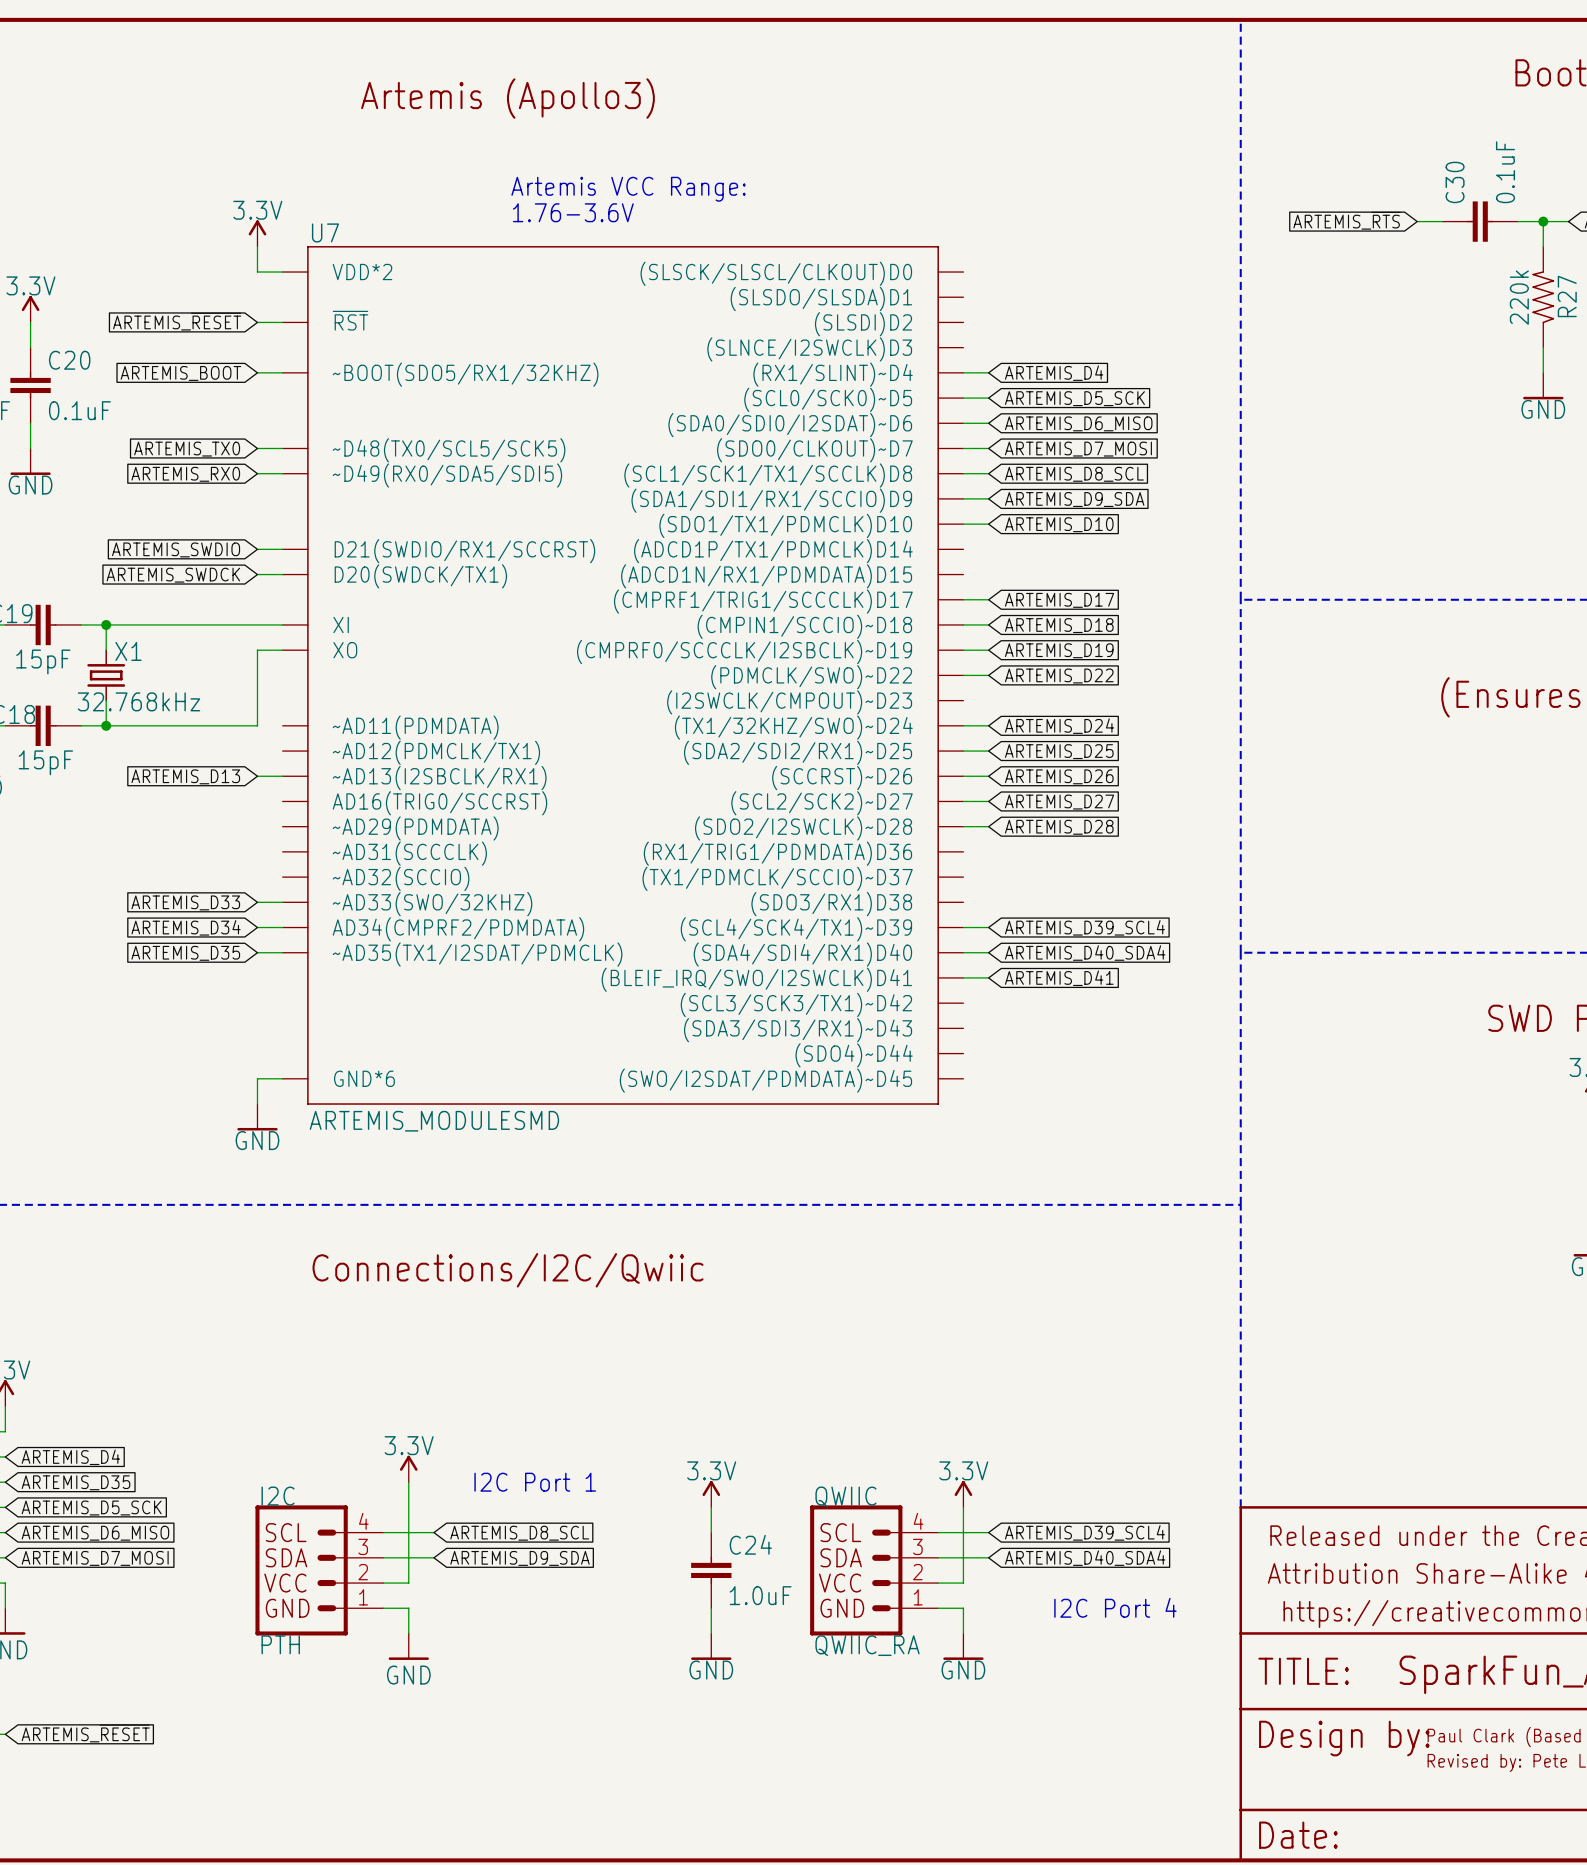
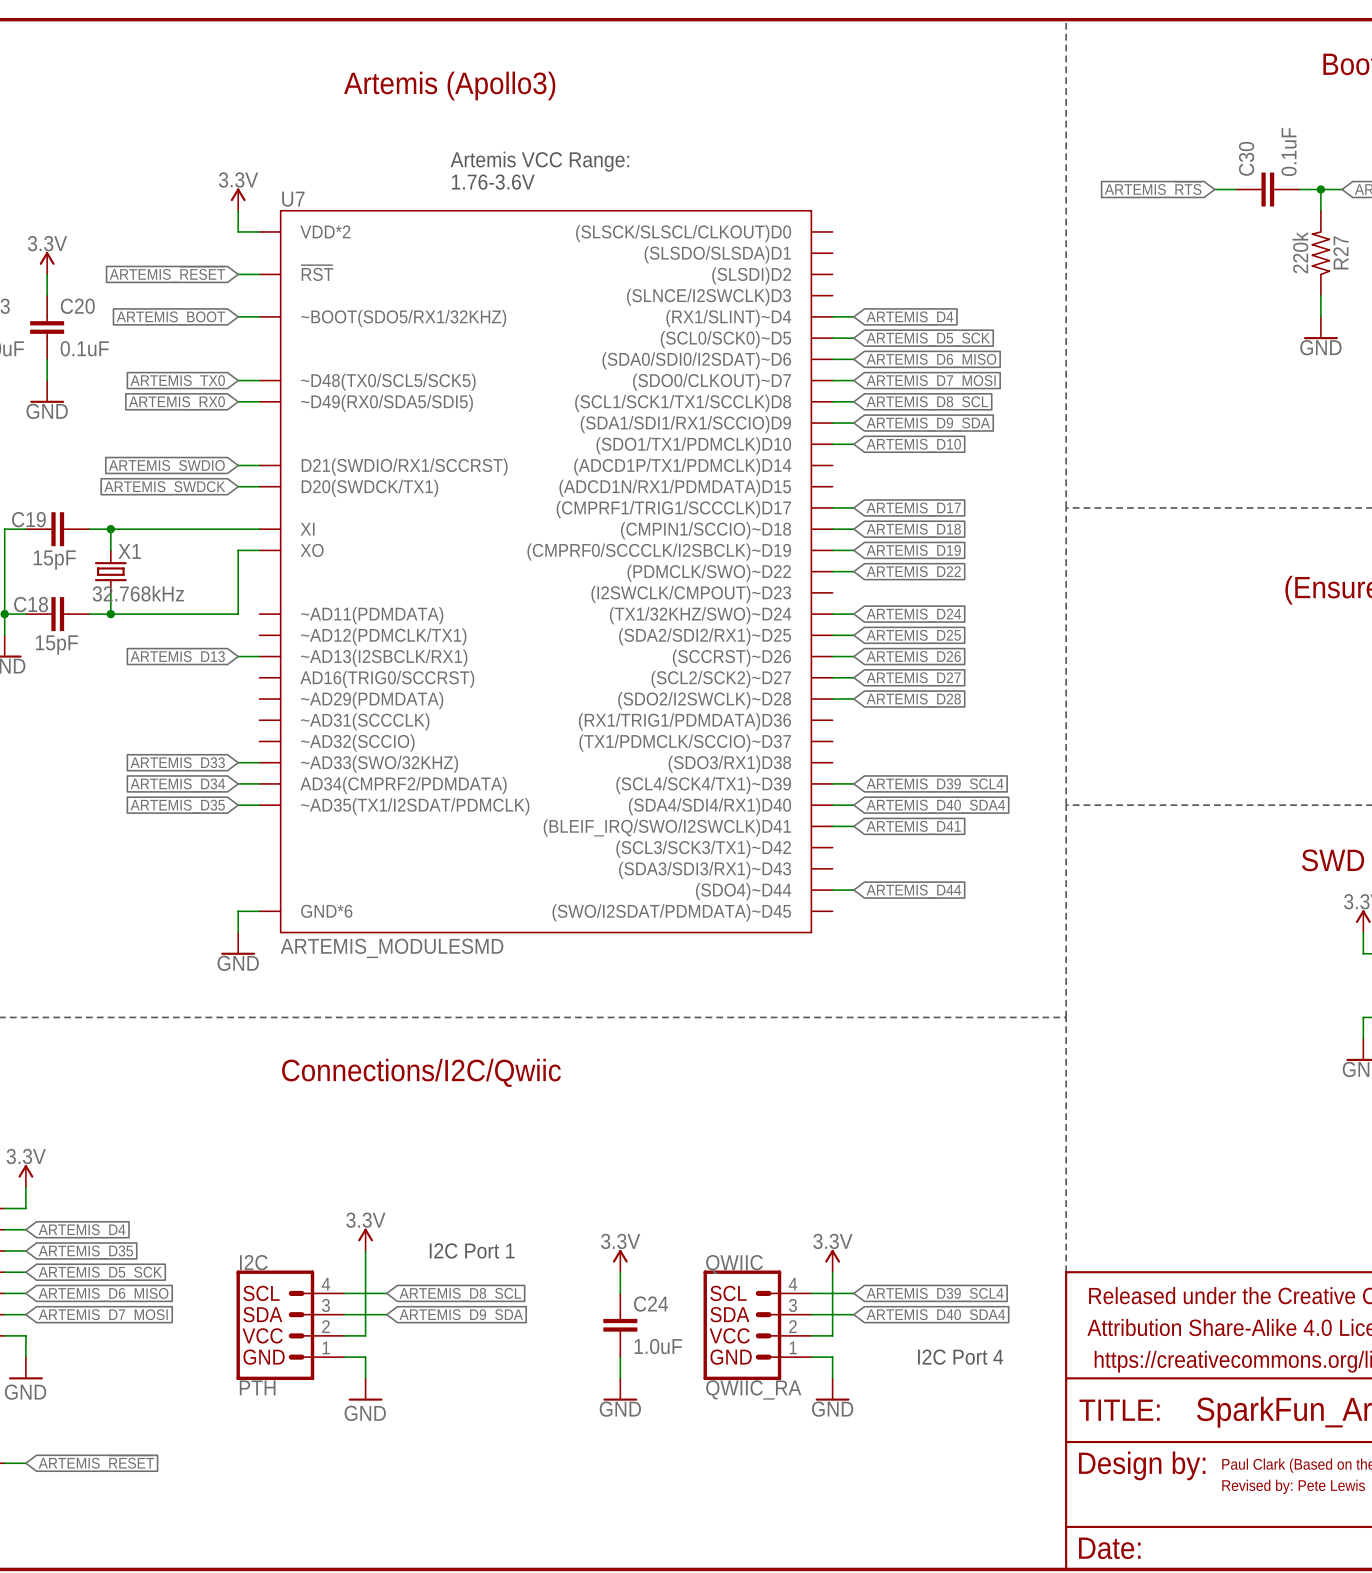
wire: none -> (832, 890) (853, 890)
global label: none -> ARTEMIS_D44 (913, 891)

